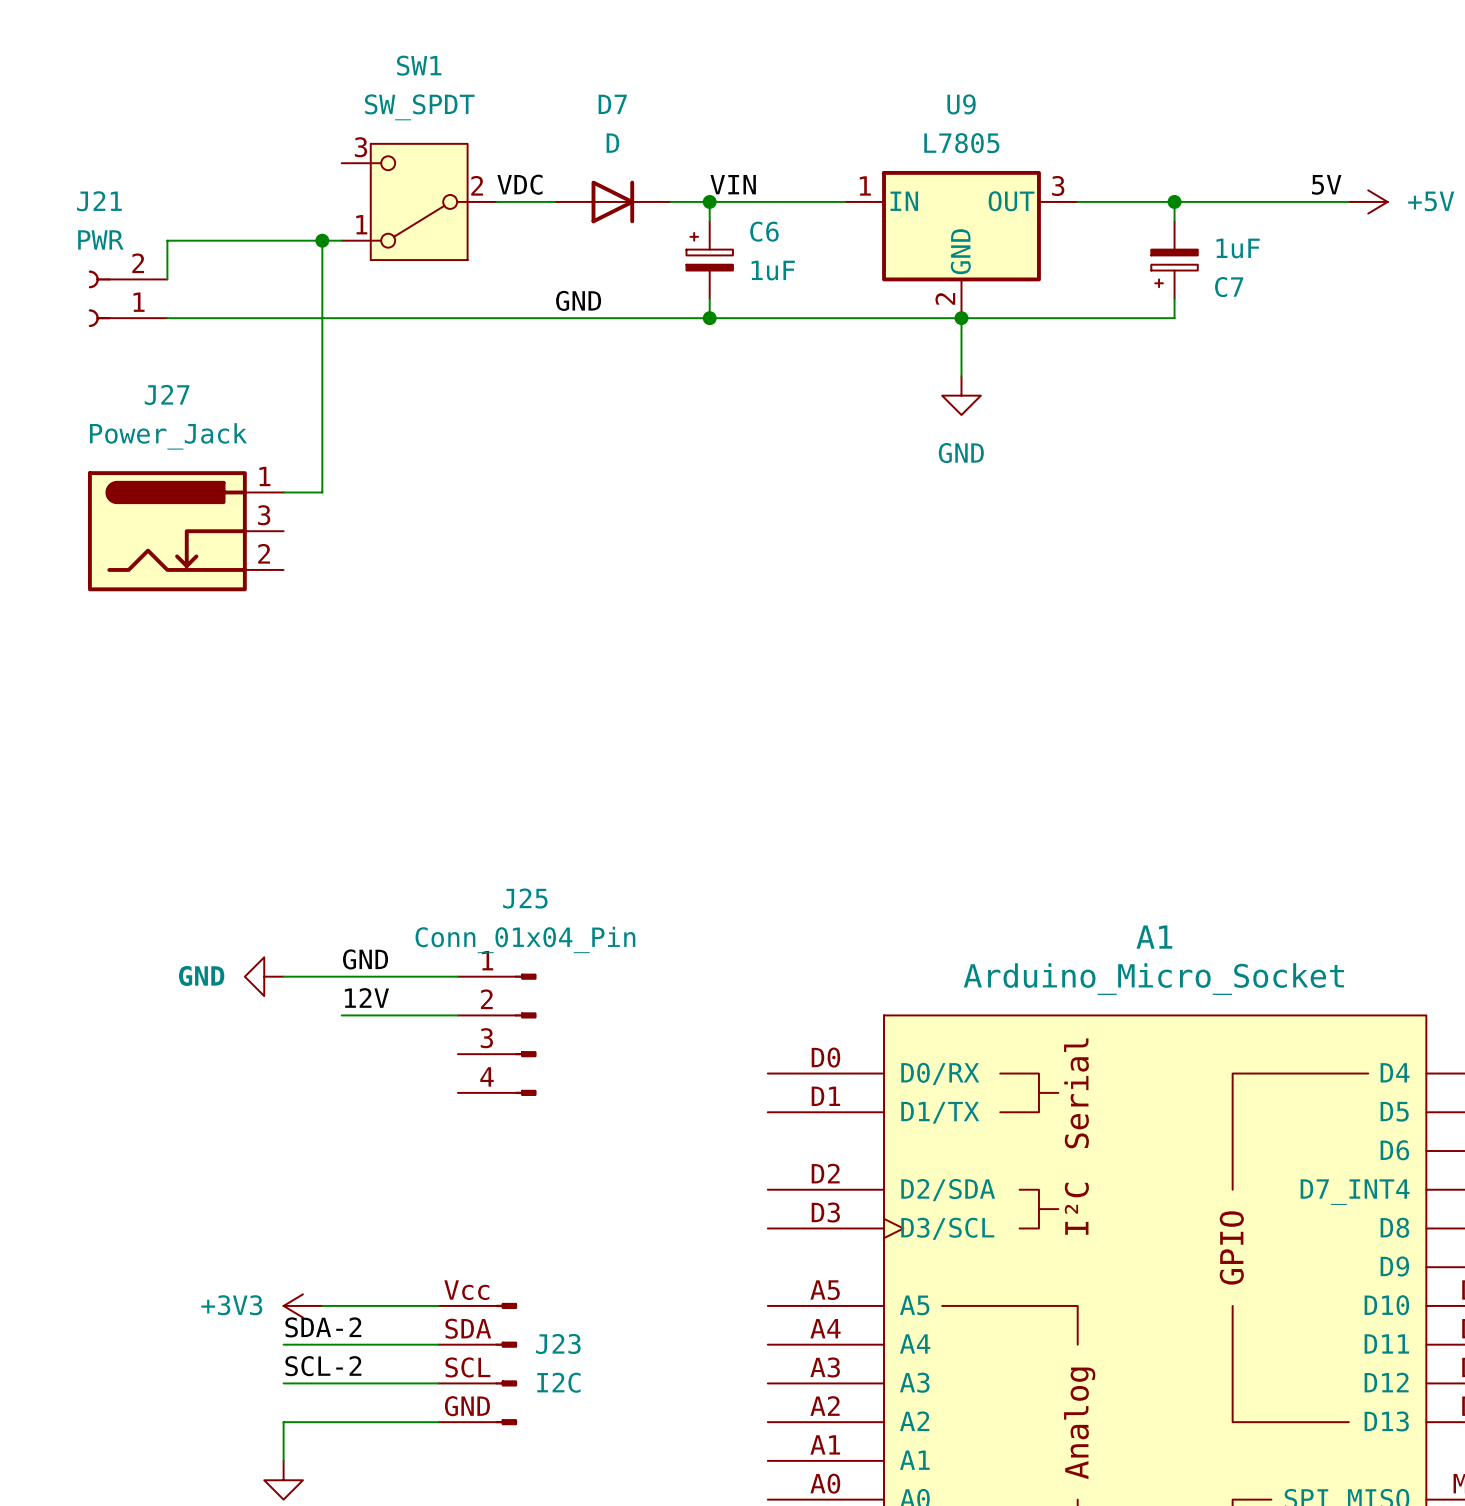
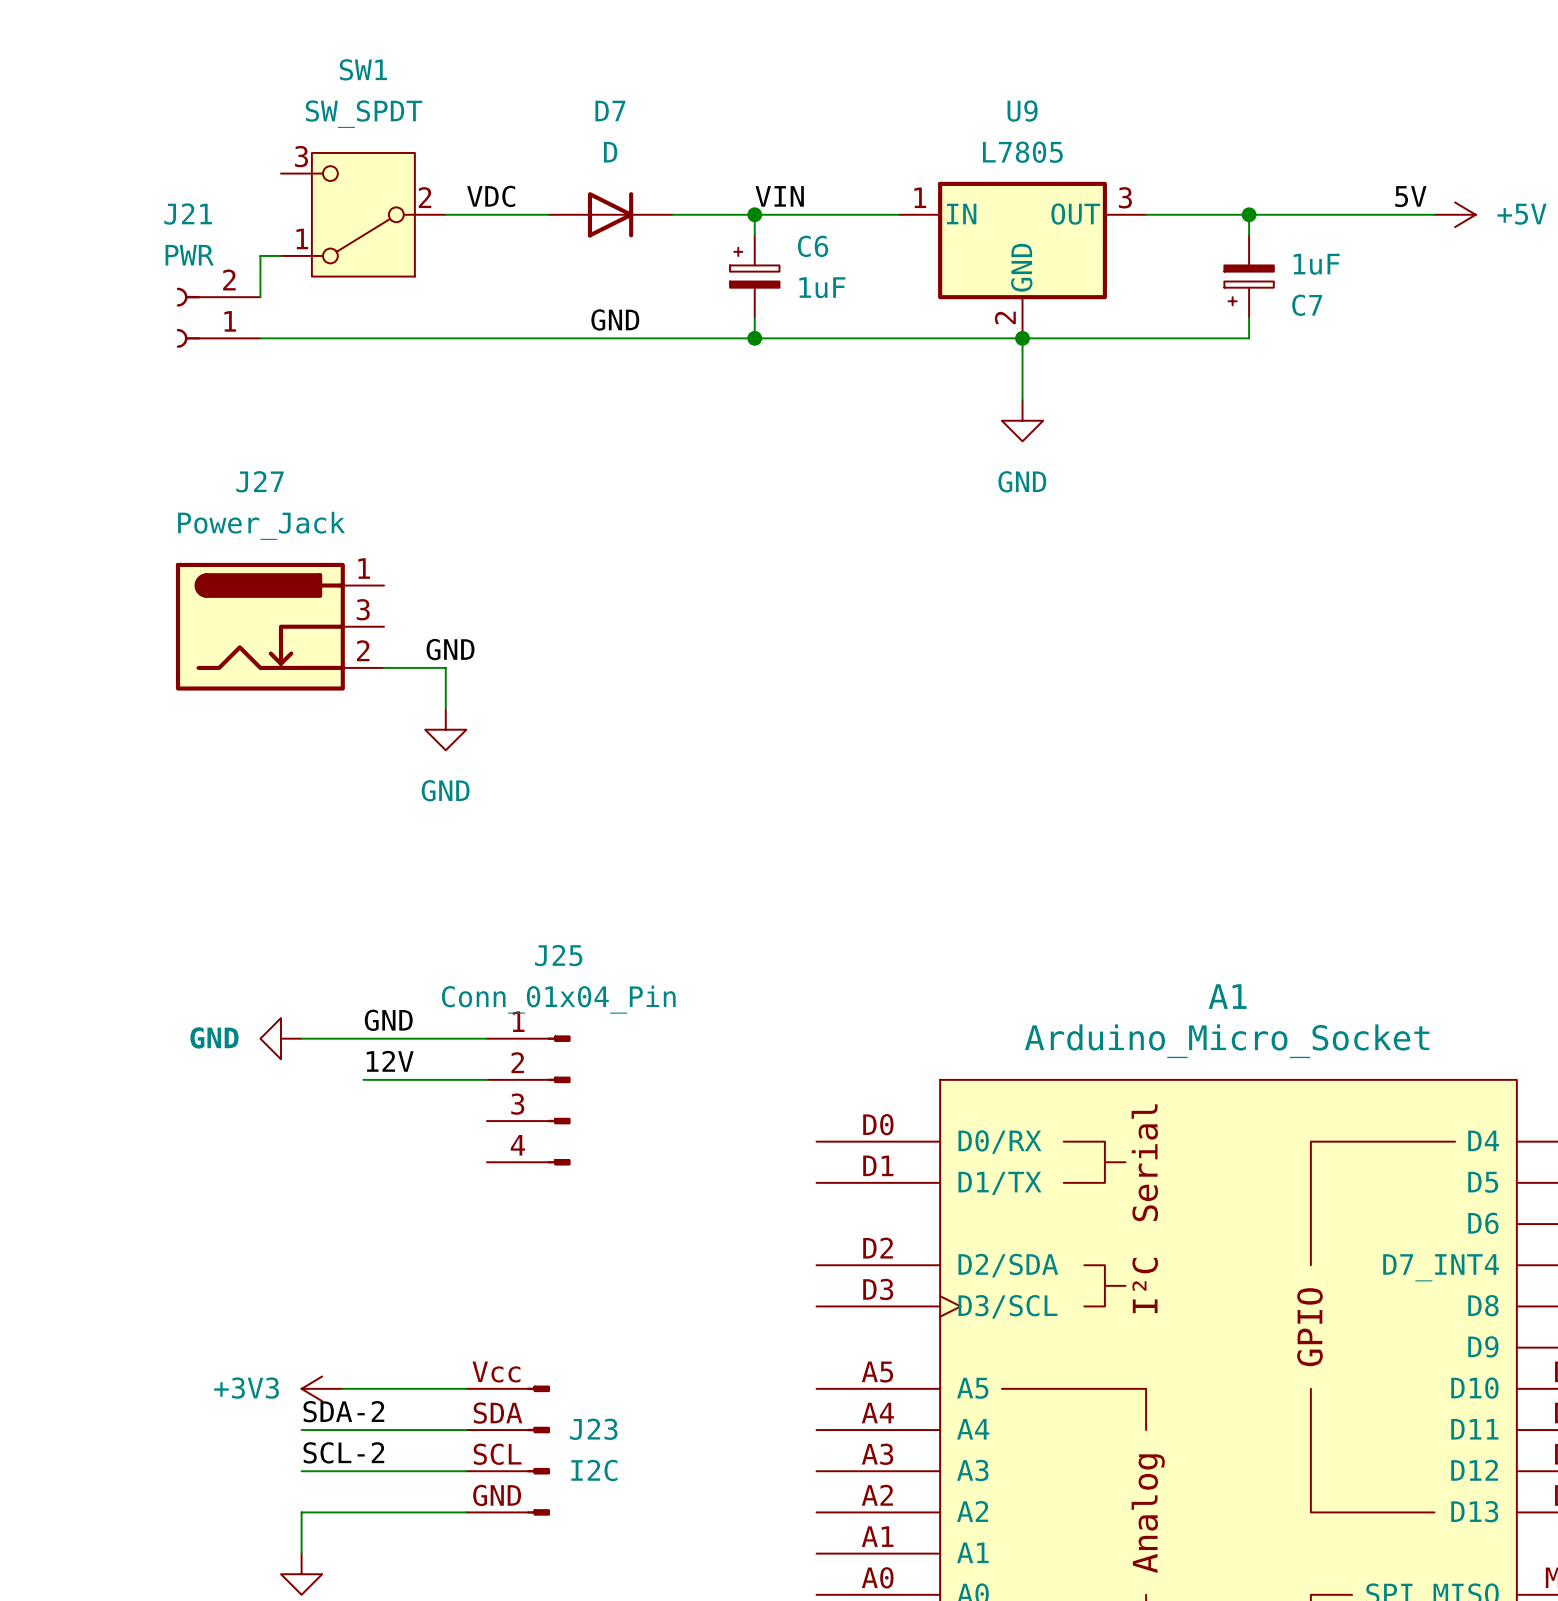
label position: VDC (519, 184) -> VDC (491, 196)
SW1 position: (419, 201) -> (363, 214)
D7 position: (612, 201) -> (610, 214)
wire: (244, 240) (167, 240) (167, 279) -> (260, 255) (260, 297)
wire: (322, 240) (322, 492) (283, 492) -> none
junction: (322, 240) -> none
J21 position: (128, 298) -> (218, 317)
J27 position: (185, 531) -> (279, 626)
label: none -> GND (450, 649)
wire: none -> (383, 667) (445, 667) (445, 709)
power symbol: none -> GND (445, 729)

